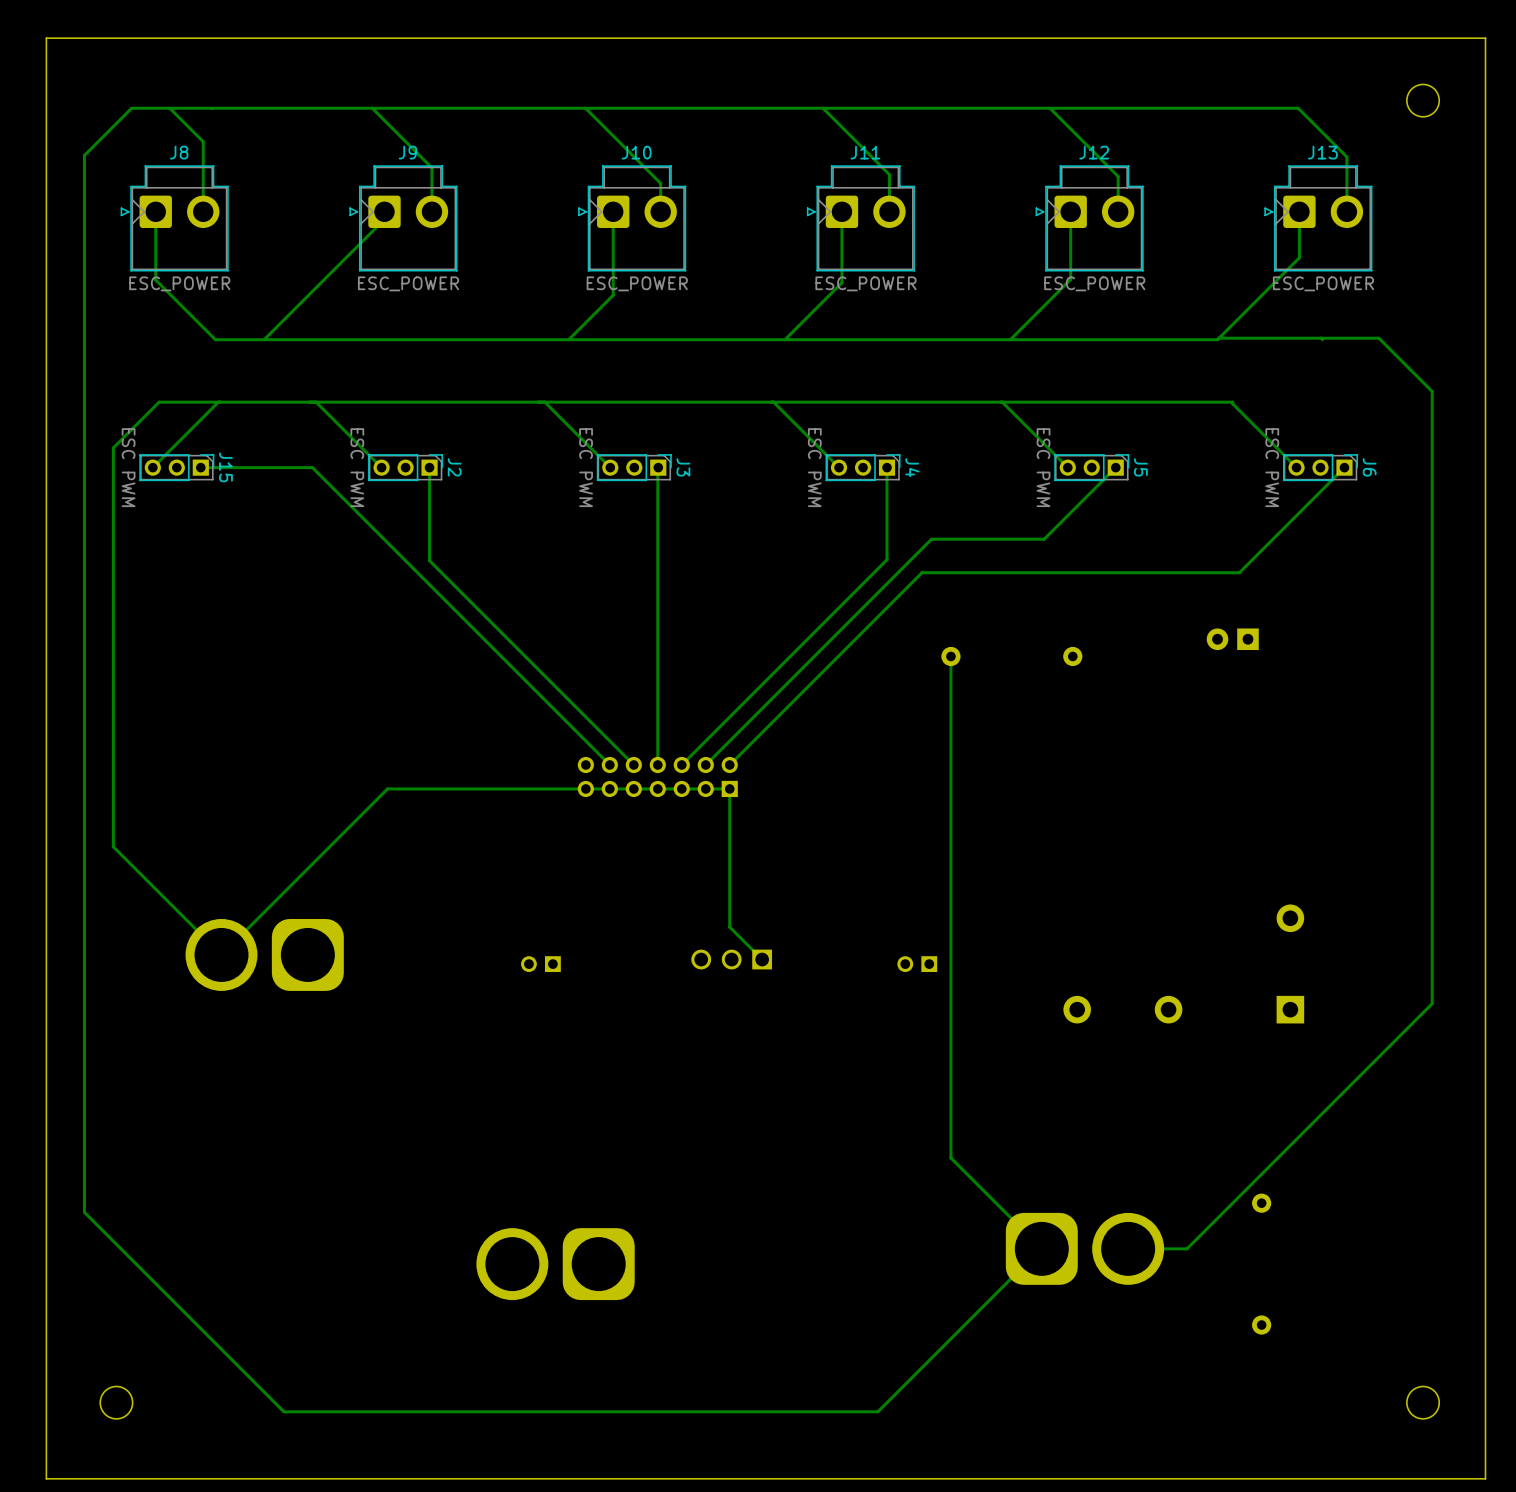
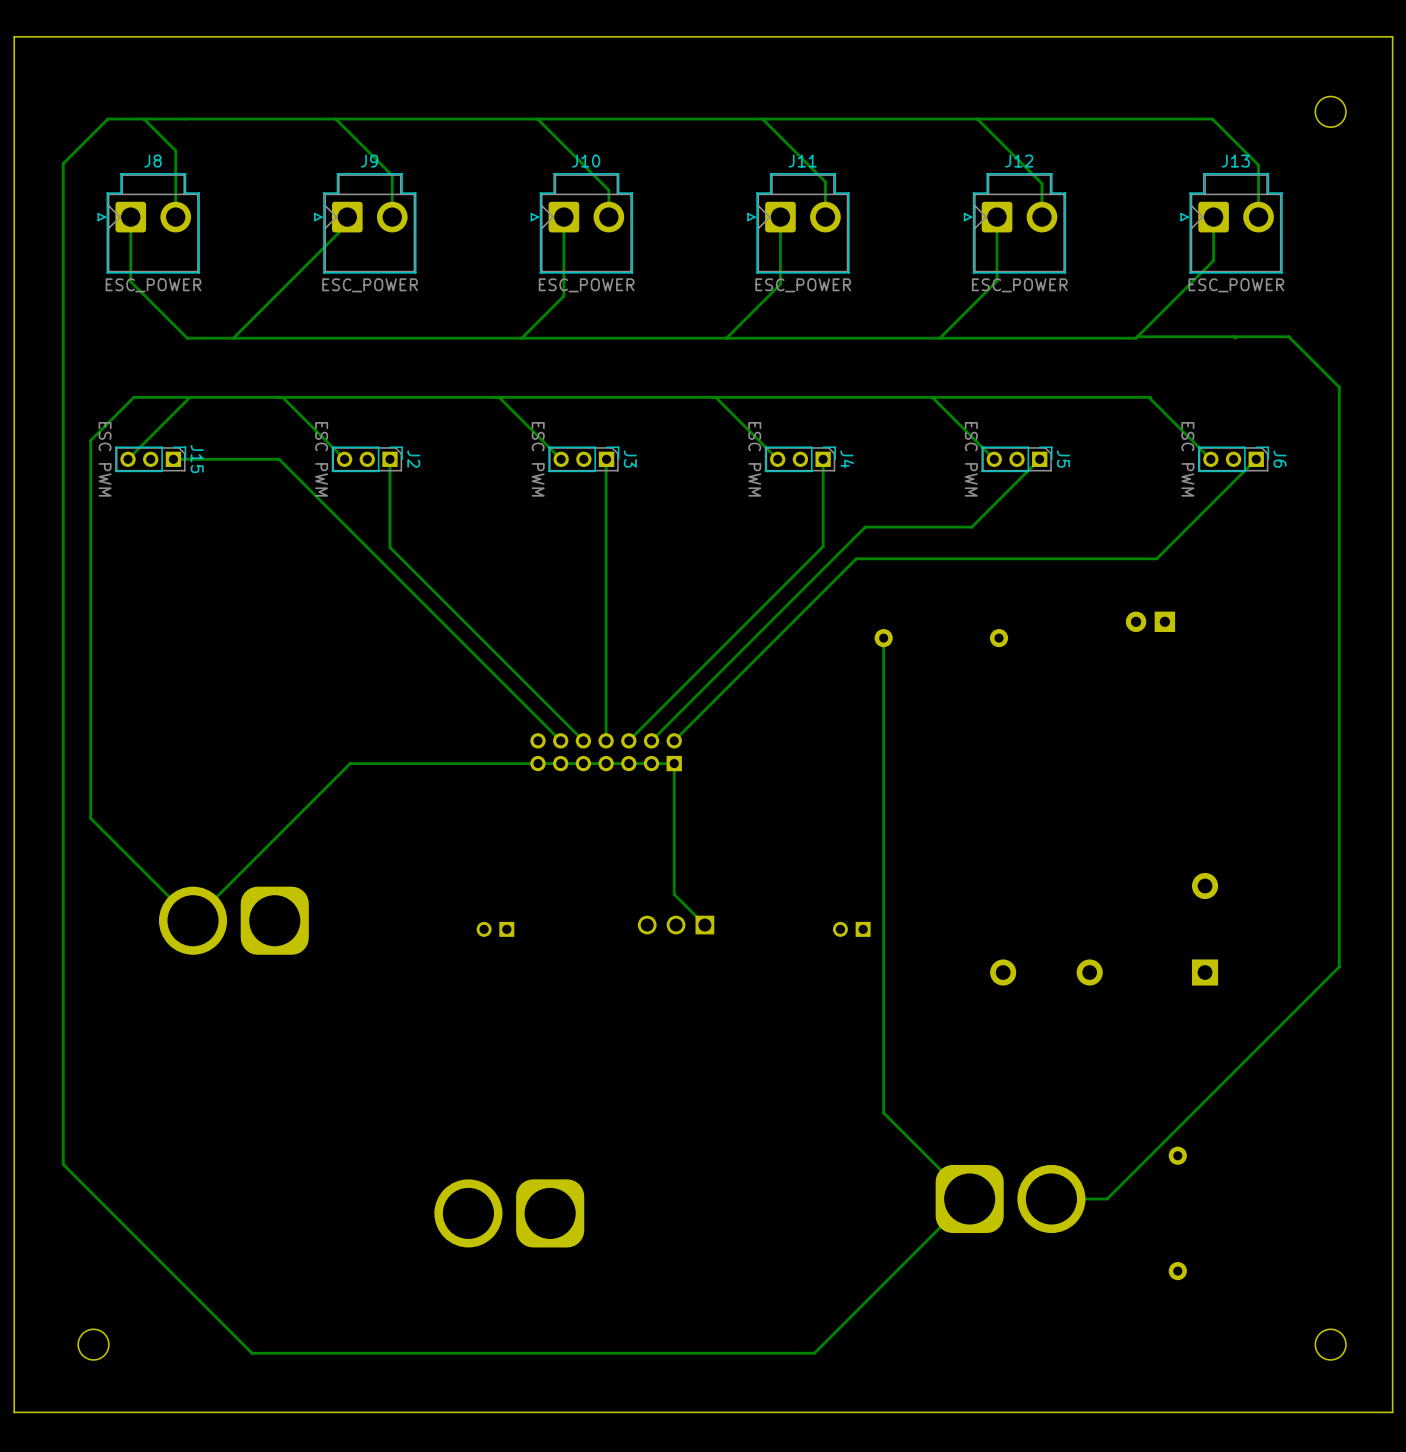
board edge: (1485, 38) (46, 38) (46, 1478) (1485, 1478) (1485, 38) -> (1392, 36) (1392, 1412) (14, 1412) (14, 36) (1392, 36)

